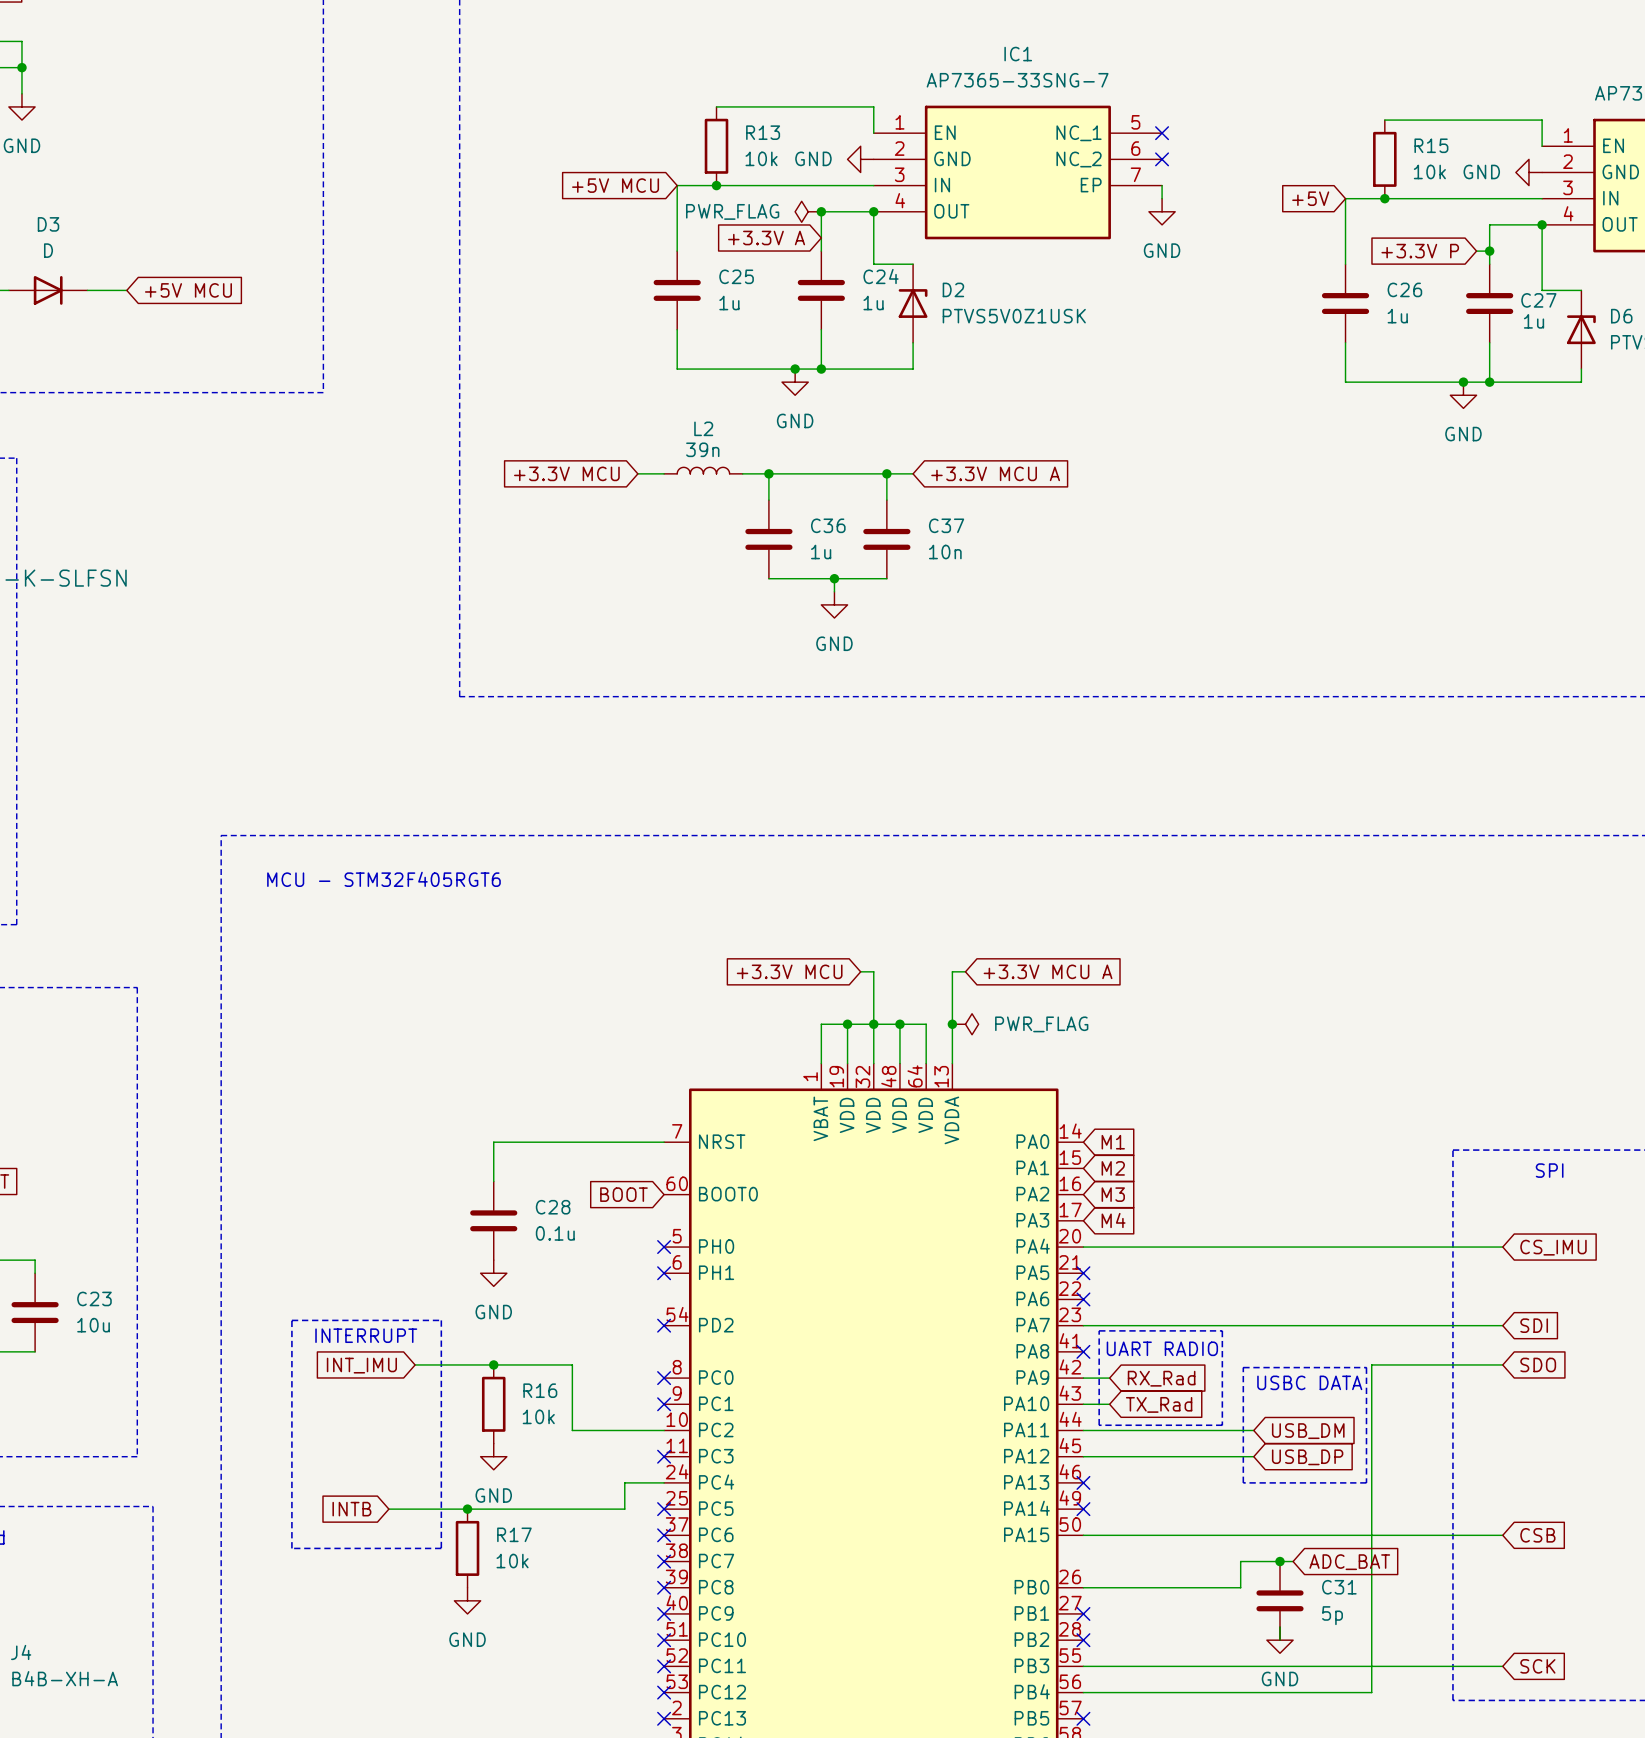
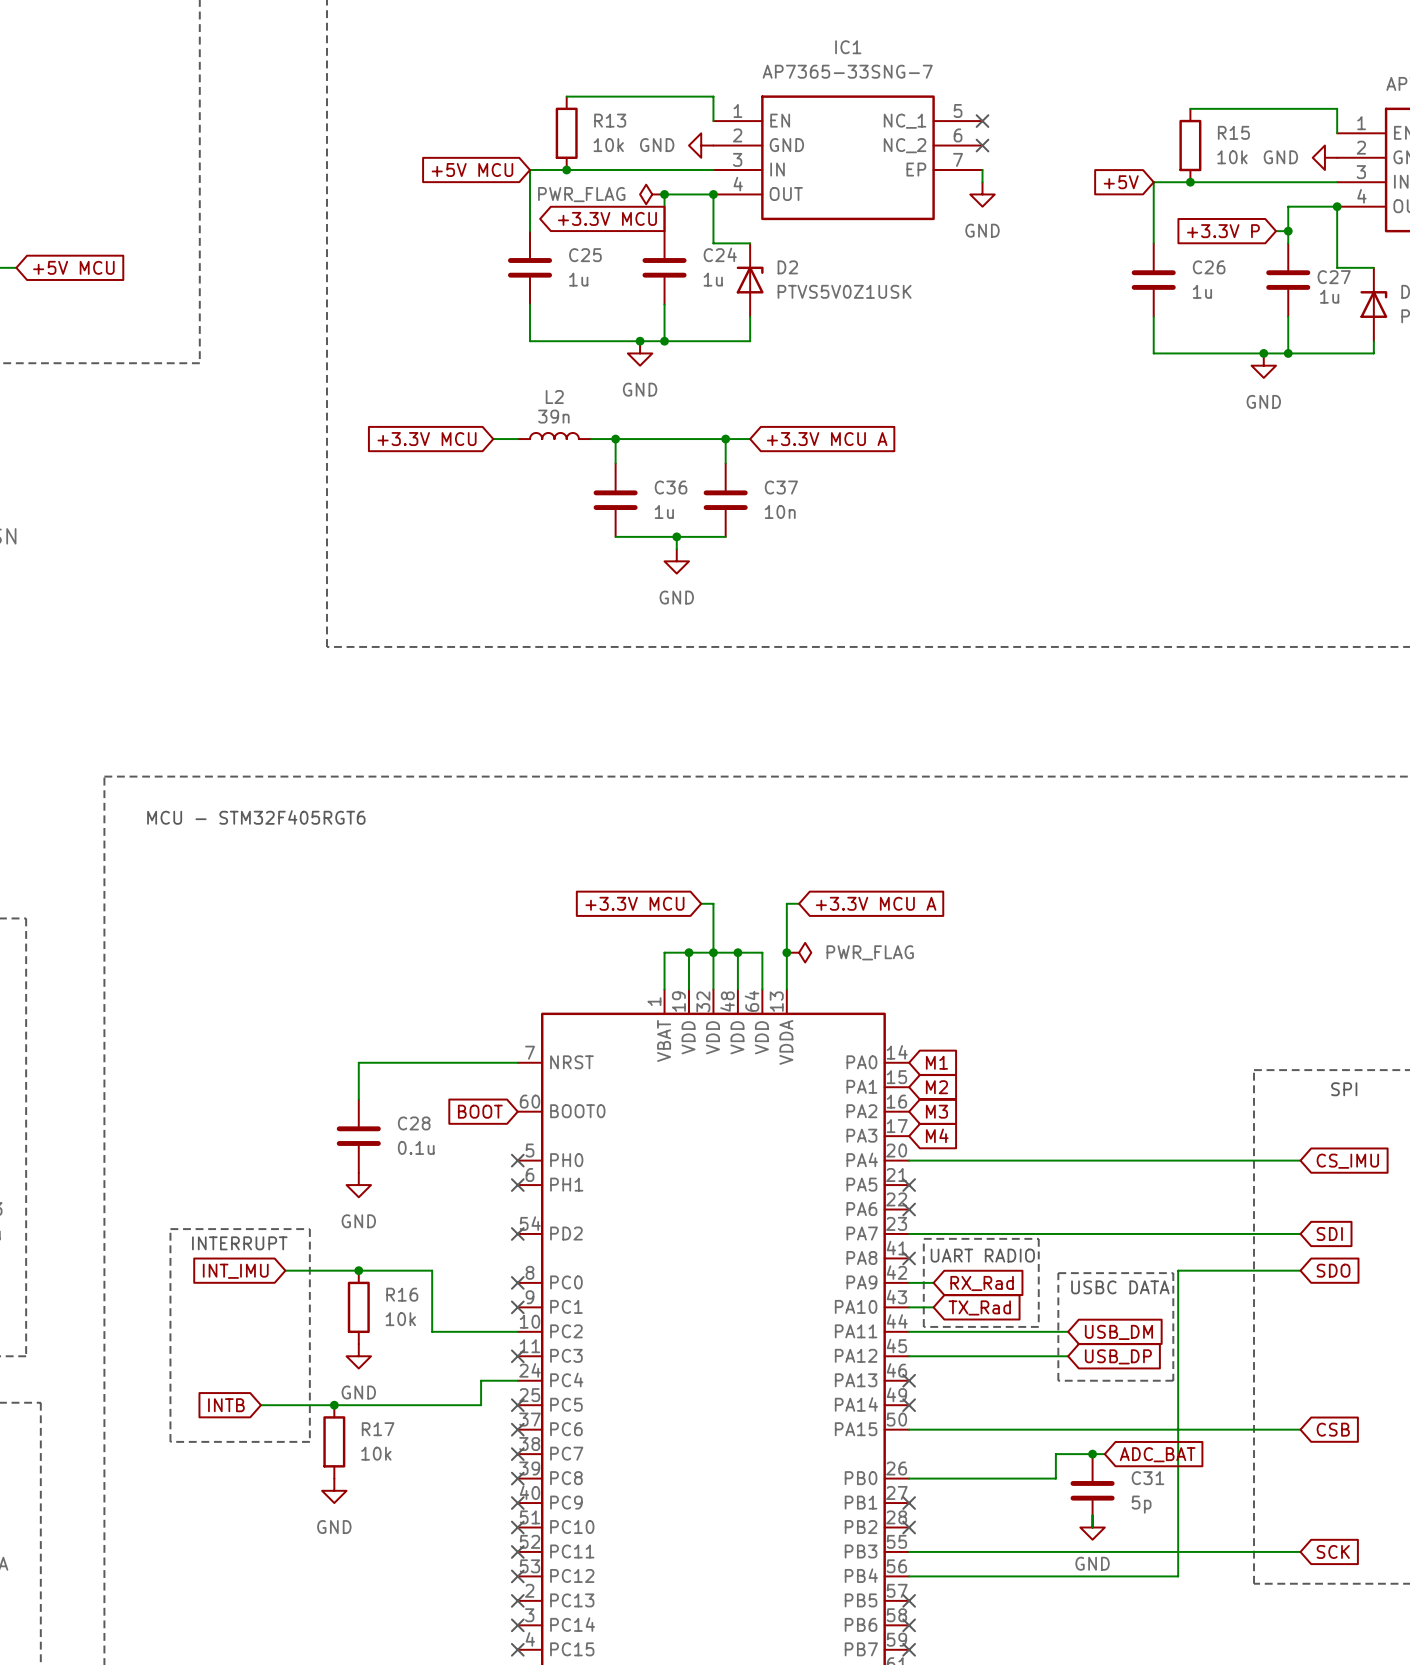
global label shape: input (766, 238) -> output (607, 218)
global label: +3.3V A (766, 238) -> +3.3V MCU (607, 218)

